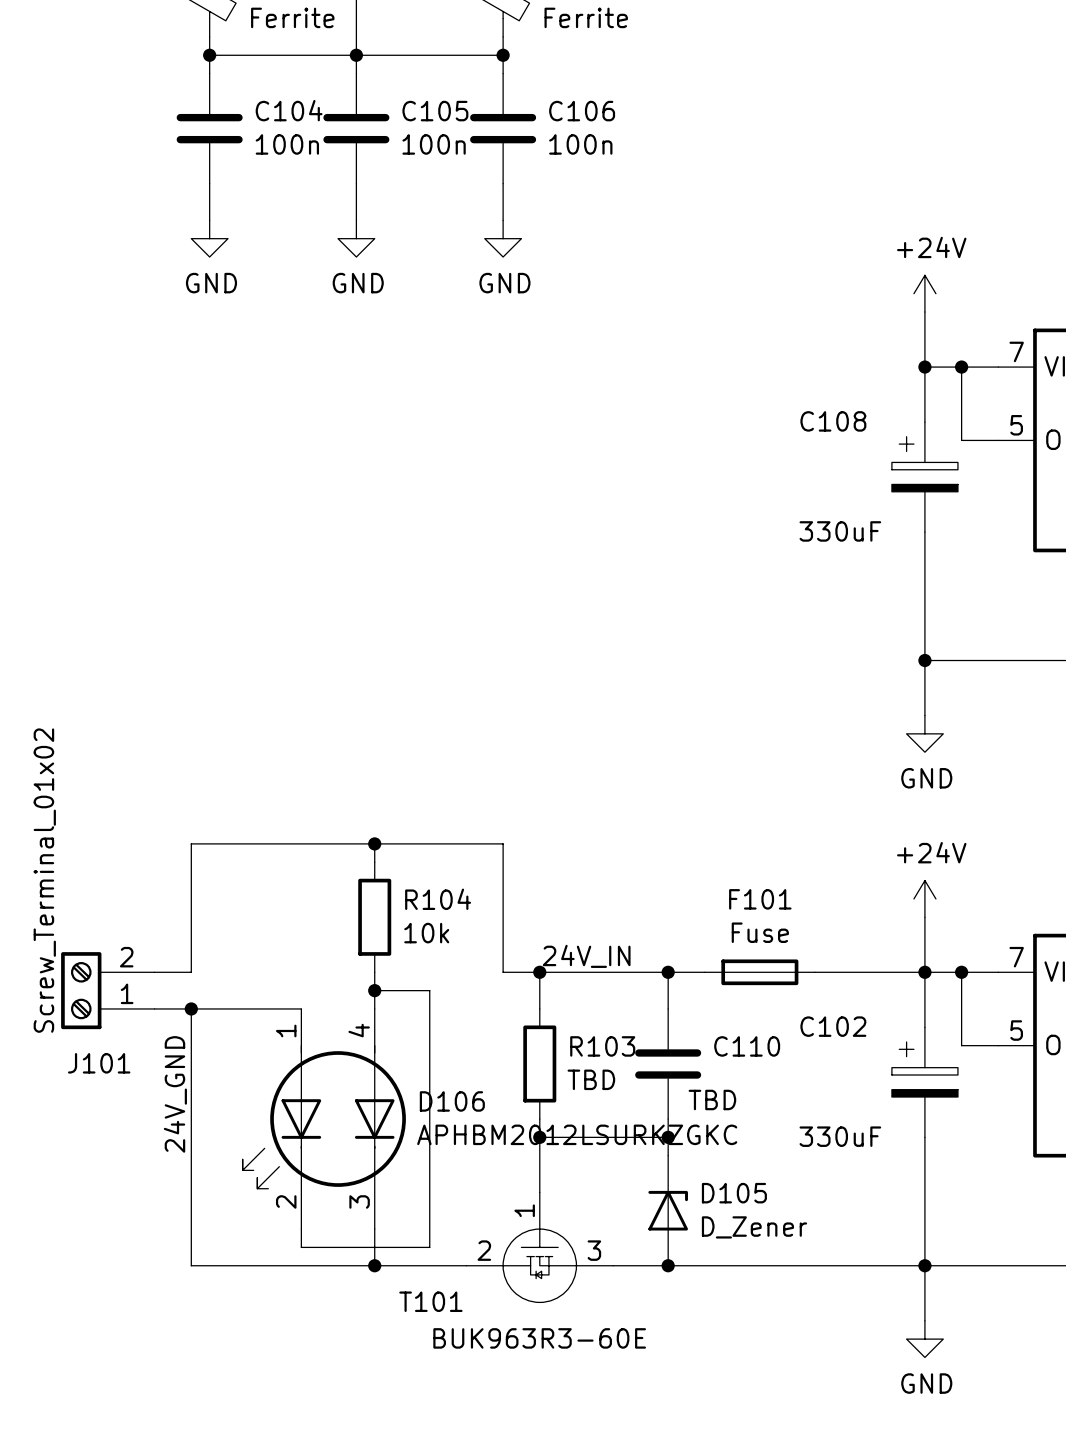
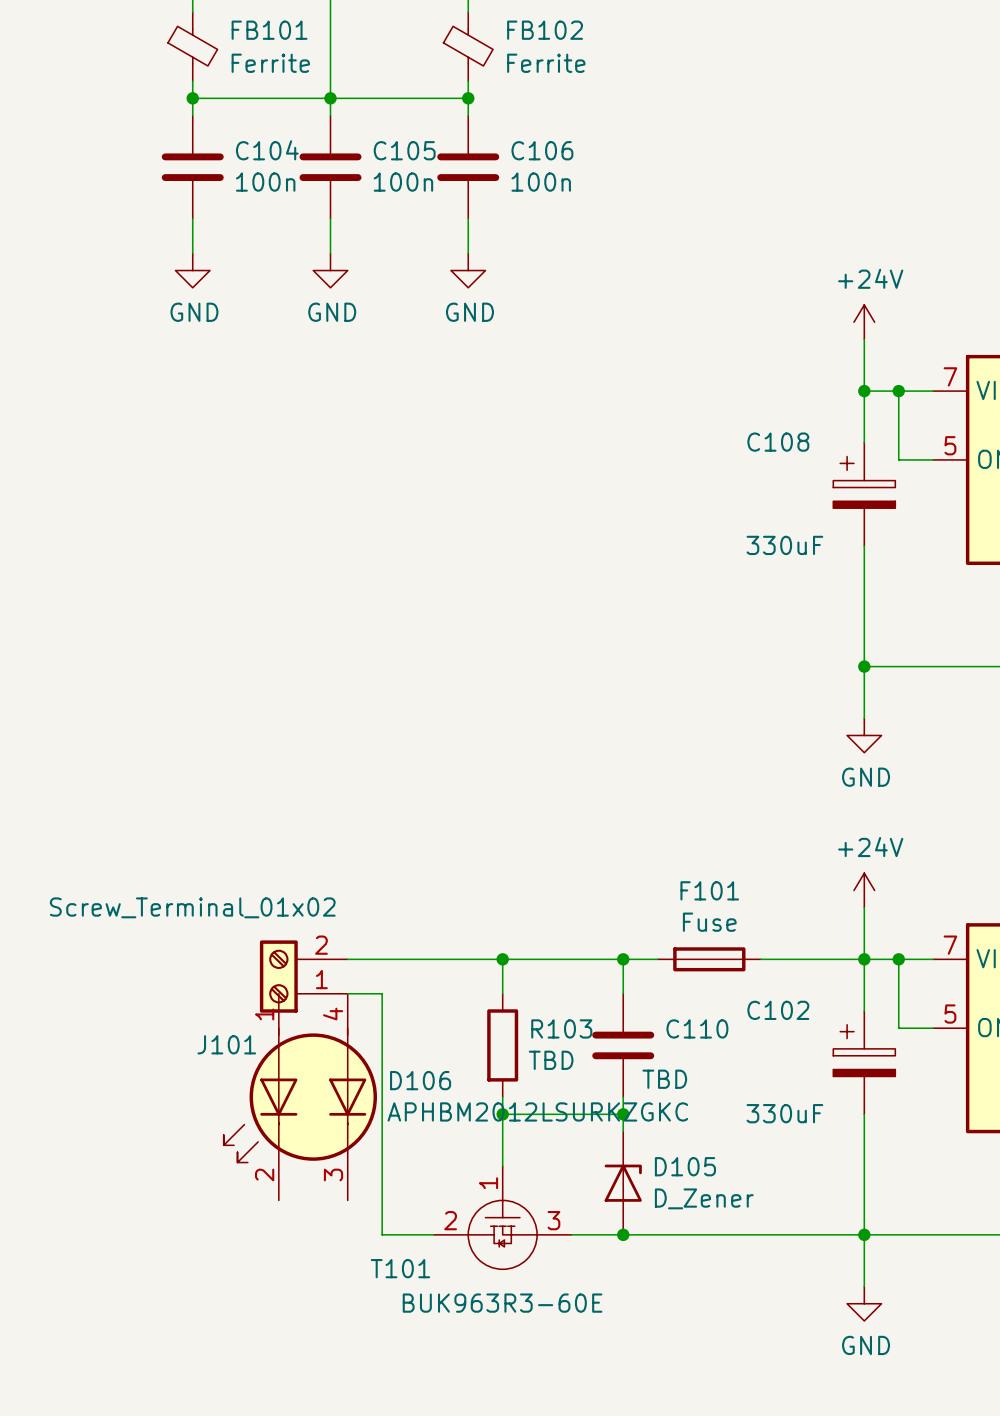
wire: (374, 843) (374, 862) -> none
junction: (374, 843) -> none
J101 value rotation: 0° (44, 880) -> 90° clockwise (192, 907)
R104: 10k (374, 917) -> none
label: 24V_IN (586, 956) -> none
wire: (154, 972) (191, 972) (191, 843) (503, 843) (503, 972) -> none
wire: (374, 972) (374, 1008) -> (347, 959) (468, 959)
J101 position: (107, 990) -> (303, 976)
wire: (374, 990) (429, 990) (429, 1247) (301, 1247) (301, 1229) -> none
junction: (374, 990) -> none
wire: (154, 1008) (301, 1008) -> none
wire: (191, 1008) (191, 1265) (411, 1265) -> (347, 993) (382, 993) (382, 1234)
junction: (191, 1008) -> none
J101 name position: J101 (99, 1063) -> J101 (226, 1044)
label: 24V_GND (175, 1094) -> none
wire: (374, 1229) (374, 1265) -> none
junction: (374, 1265) -> none

